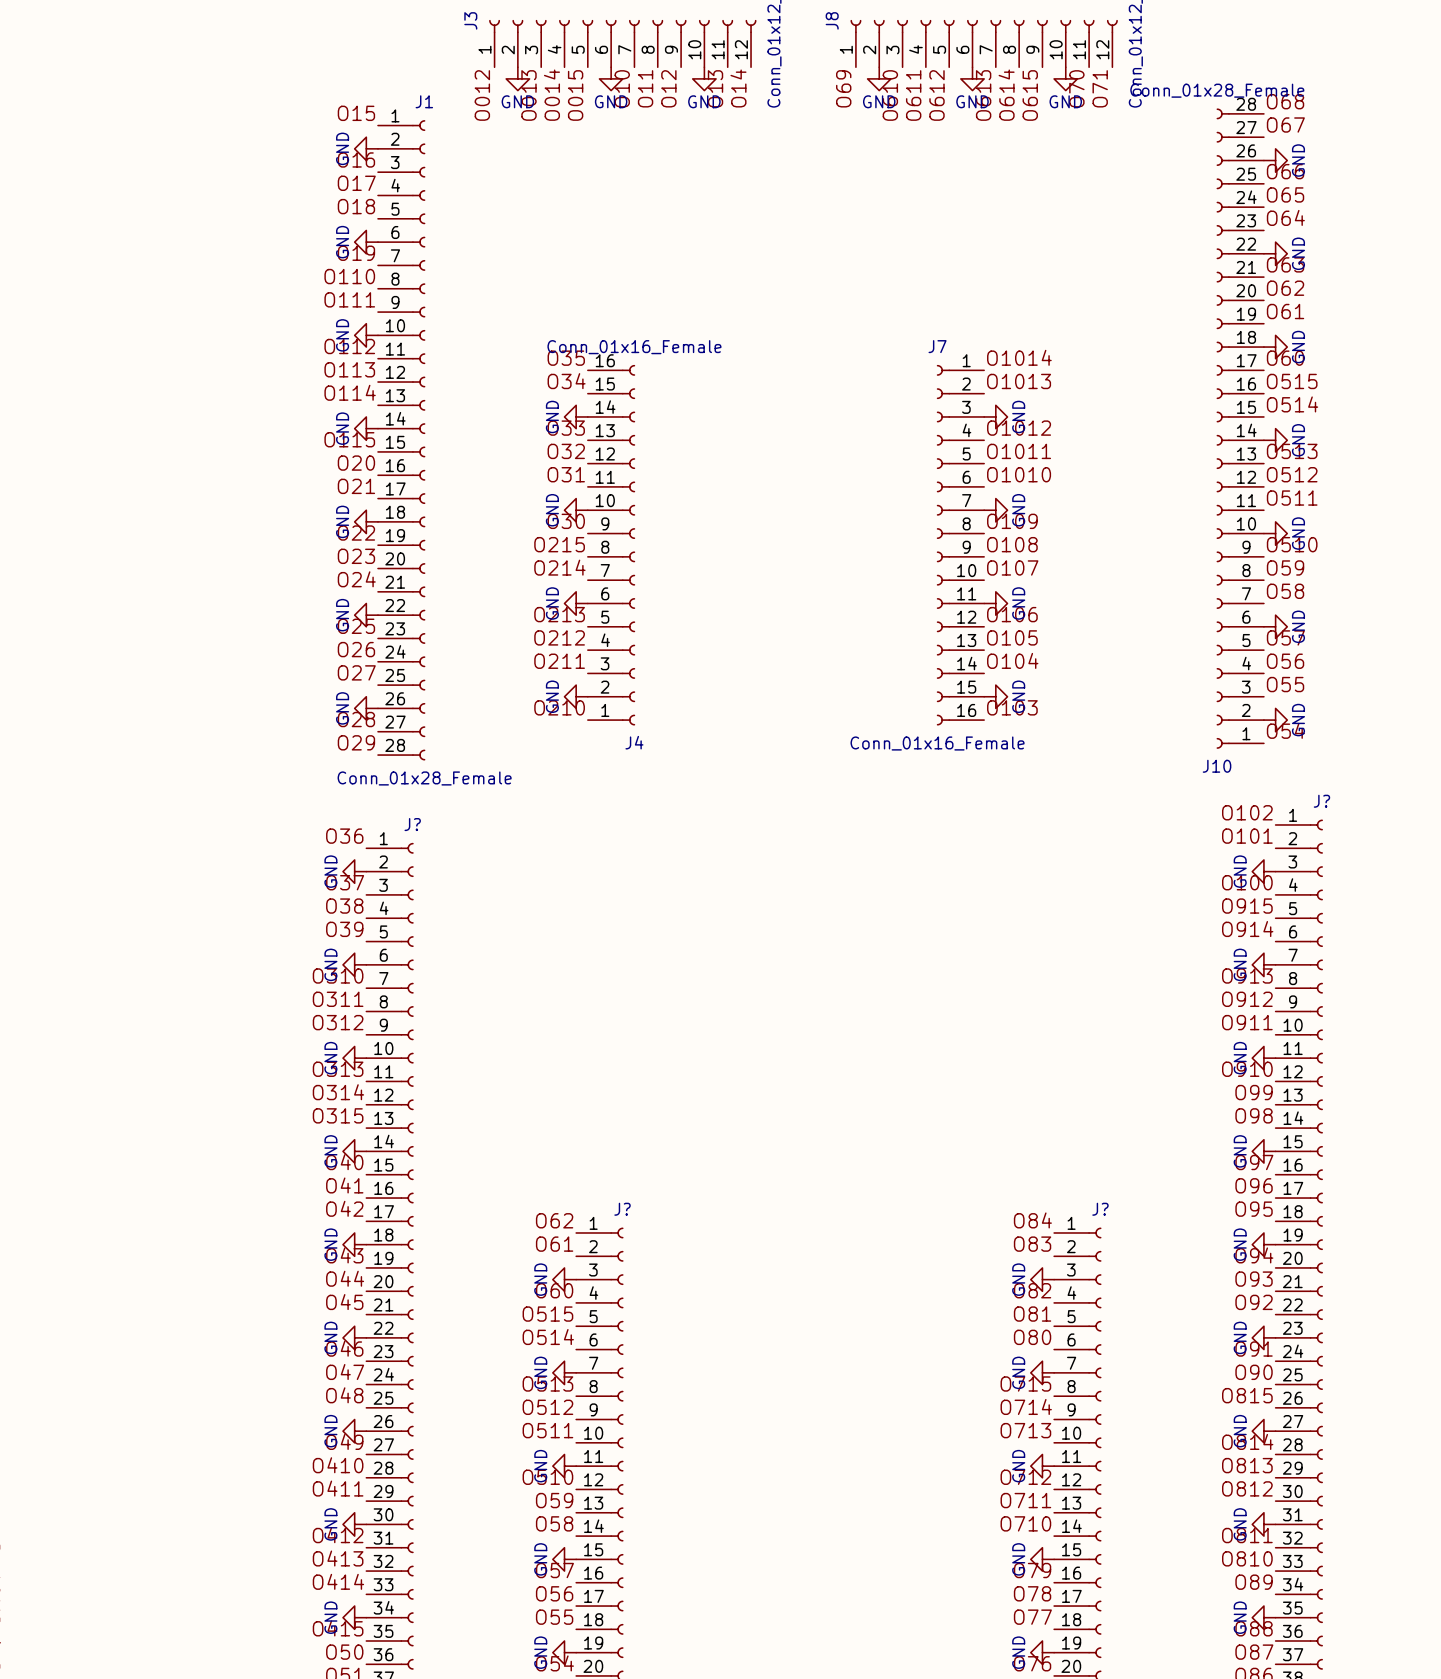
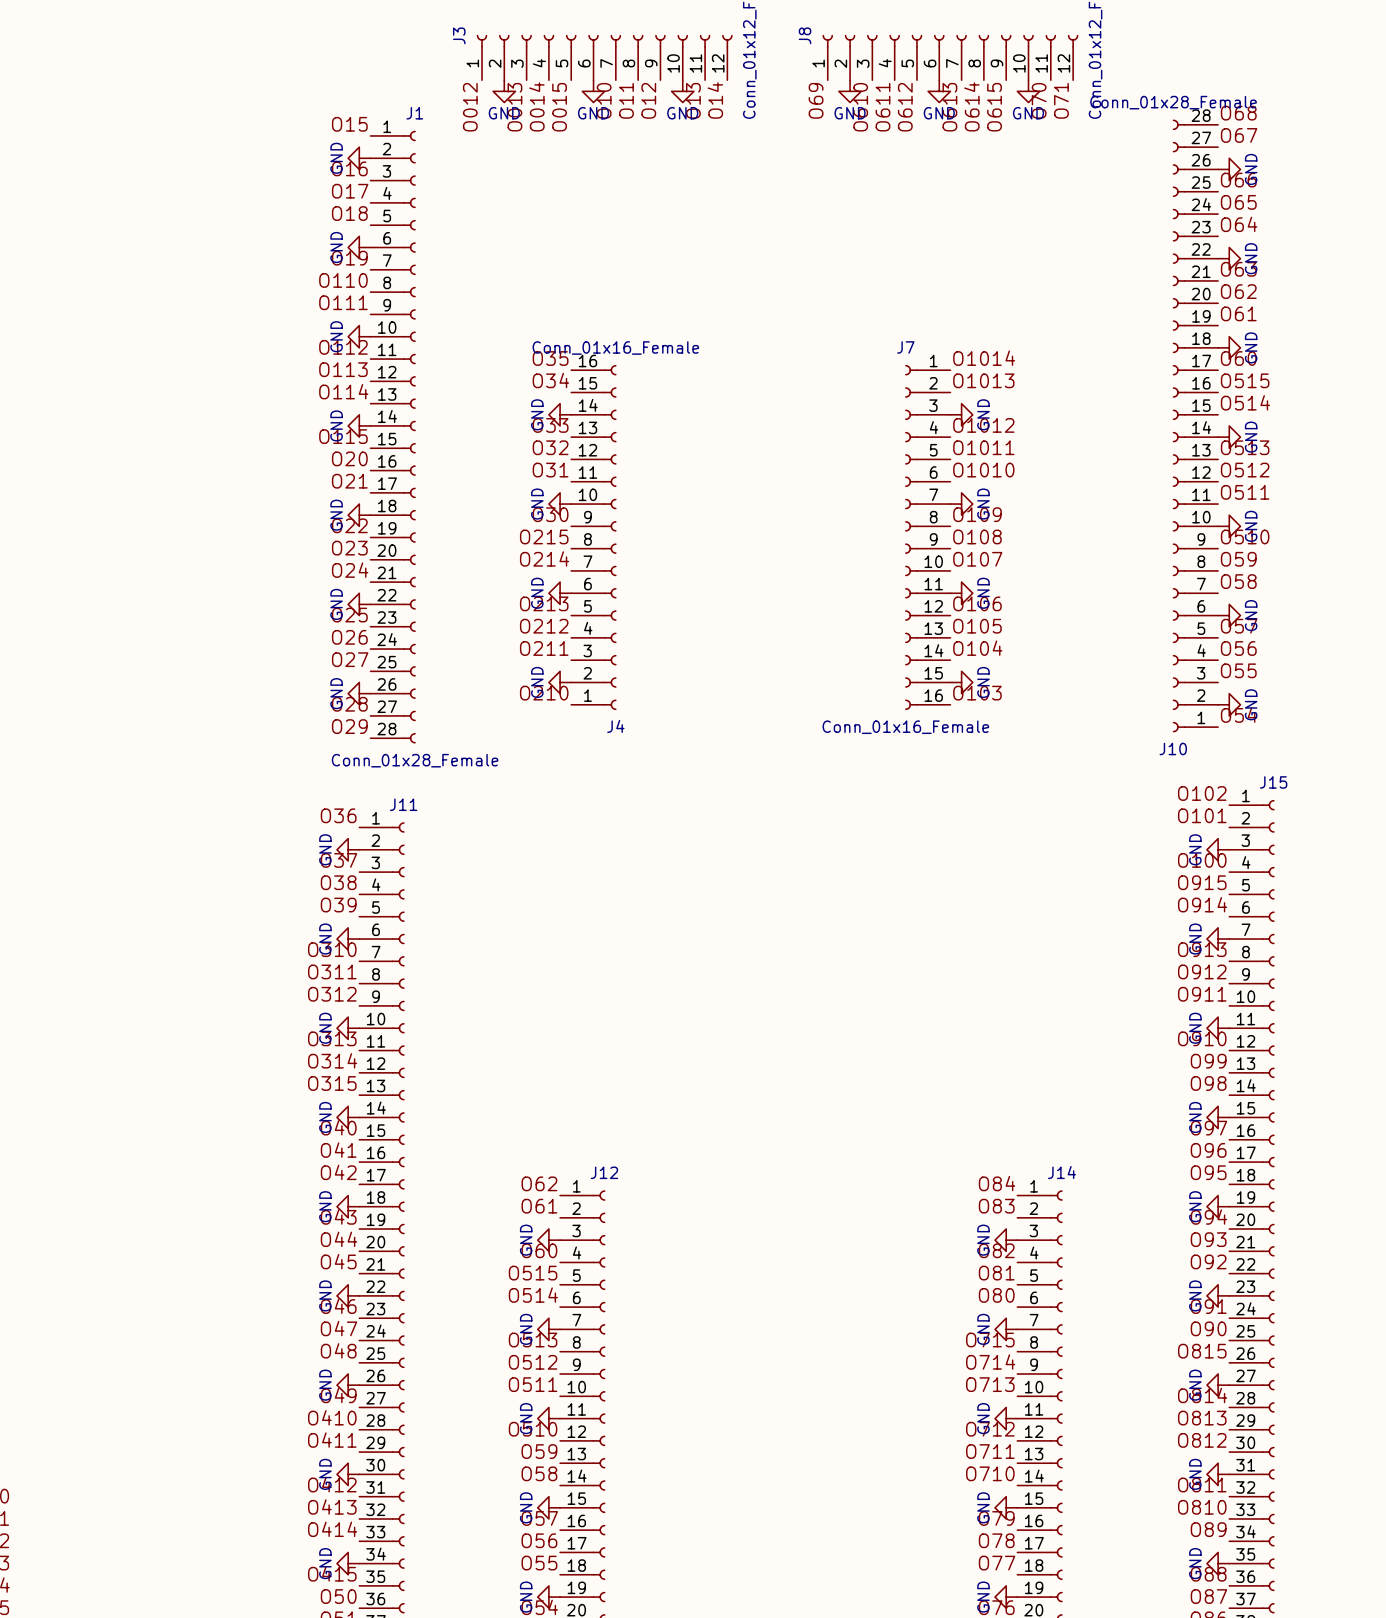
J? name: J? (1321, 801) -> J15 (1273, 782)
J? name: J? (412, 824) -> J11 (403, 804)
J? name: J? (622, 1209) -> J12 (604, 1172)
J? name: J? (1100, 1209) -> J14 (1061, 1172)

